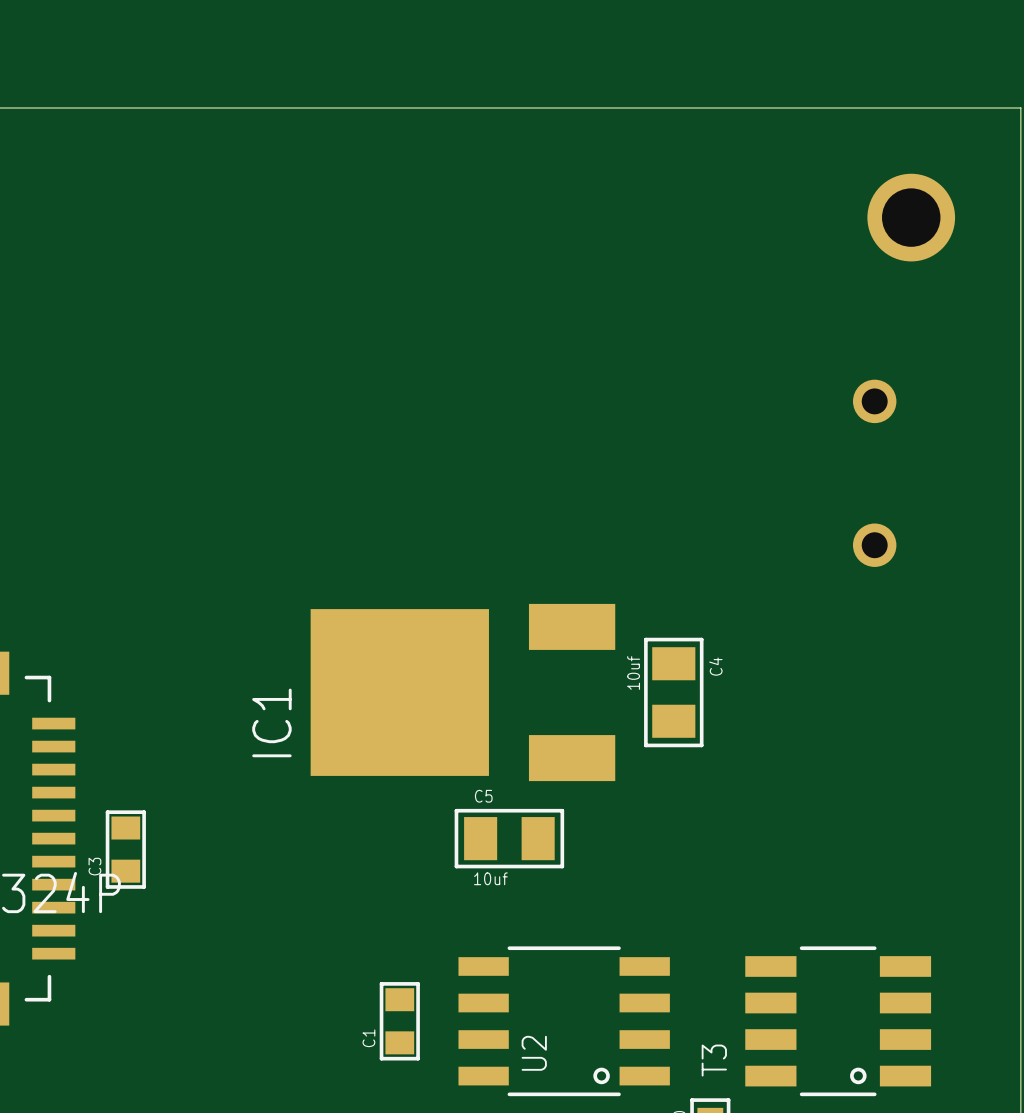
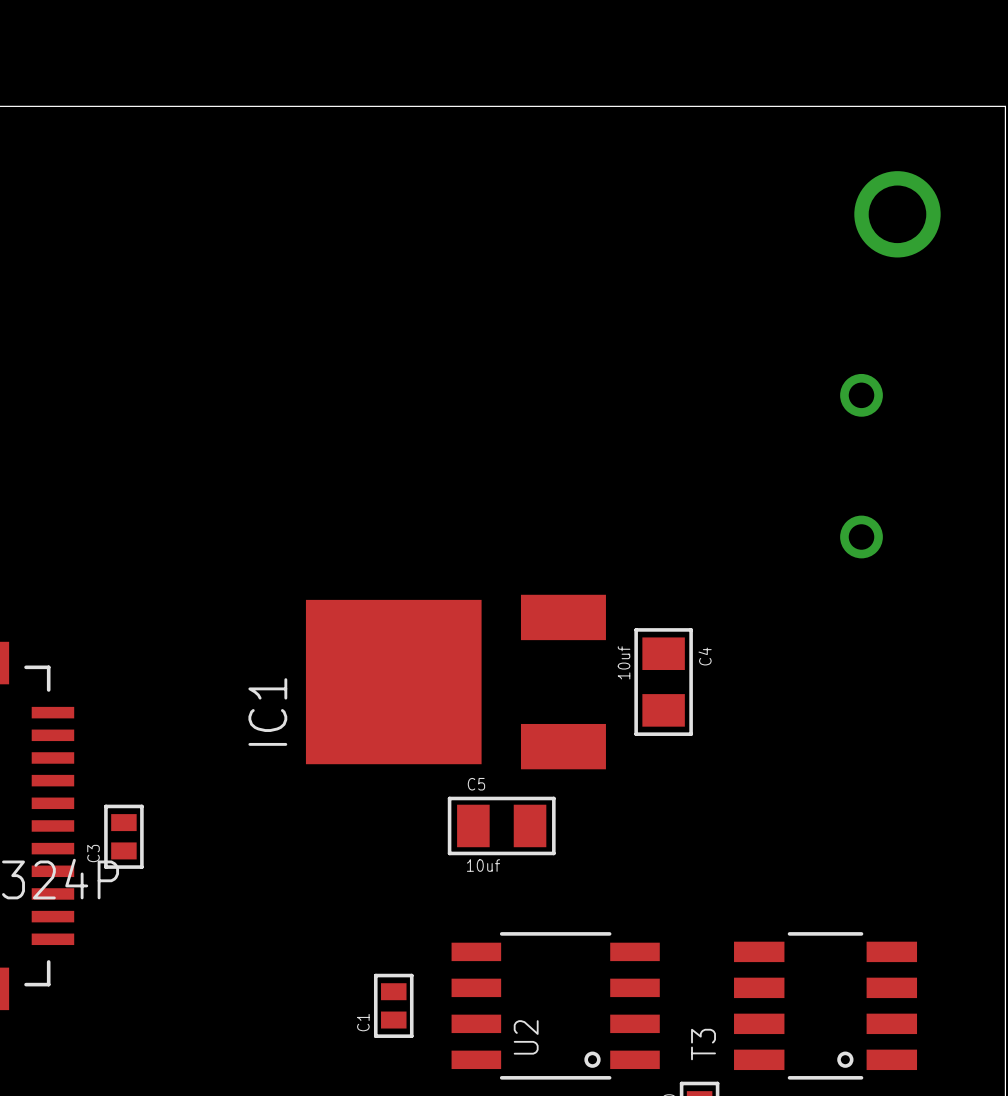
C3 footprint: [105, 810, 146, 889] -> [104, 804, 144, 869]
C1 footprint: [379, 982, 420, 1061] -> [373, 973, 414, 1038]

